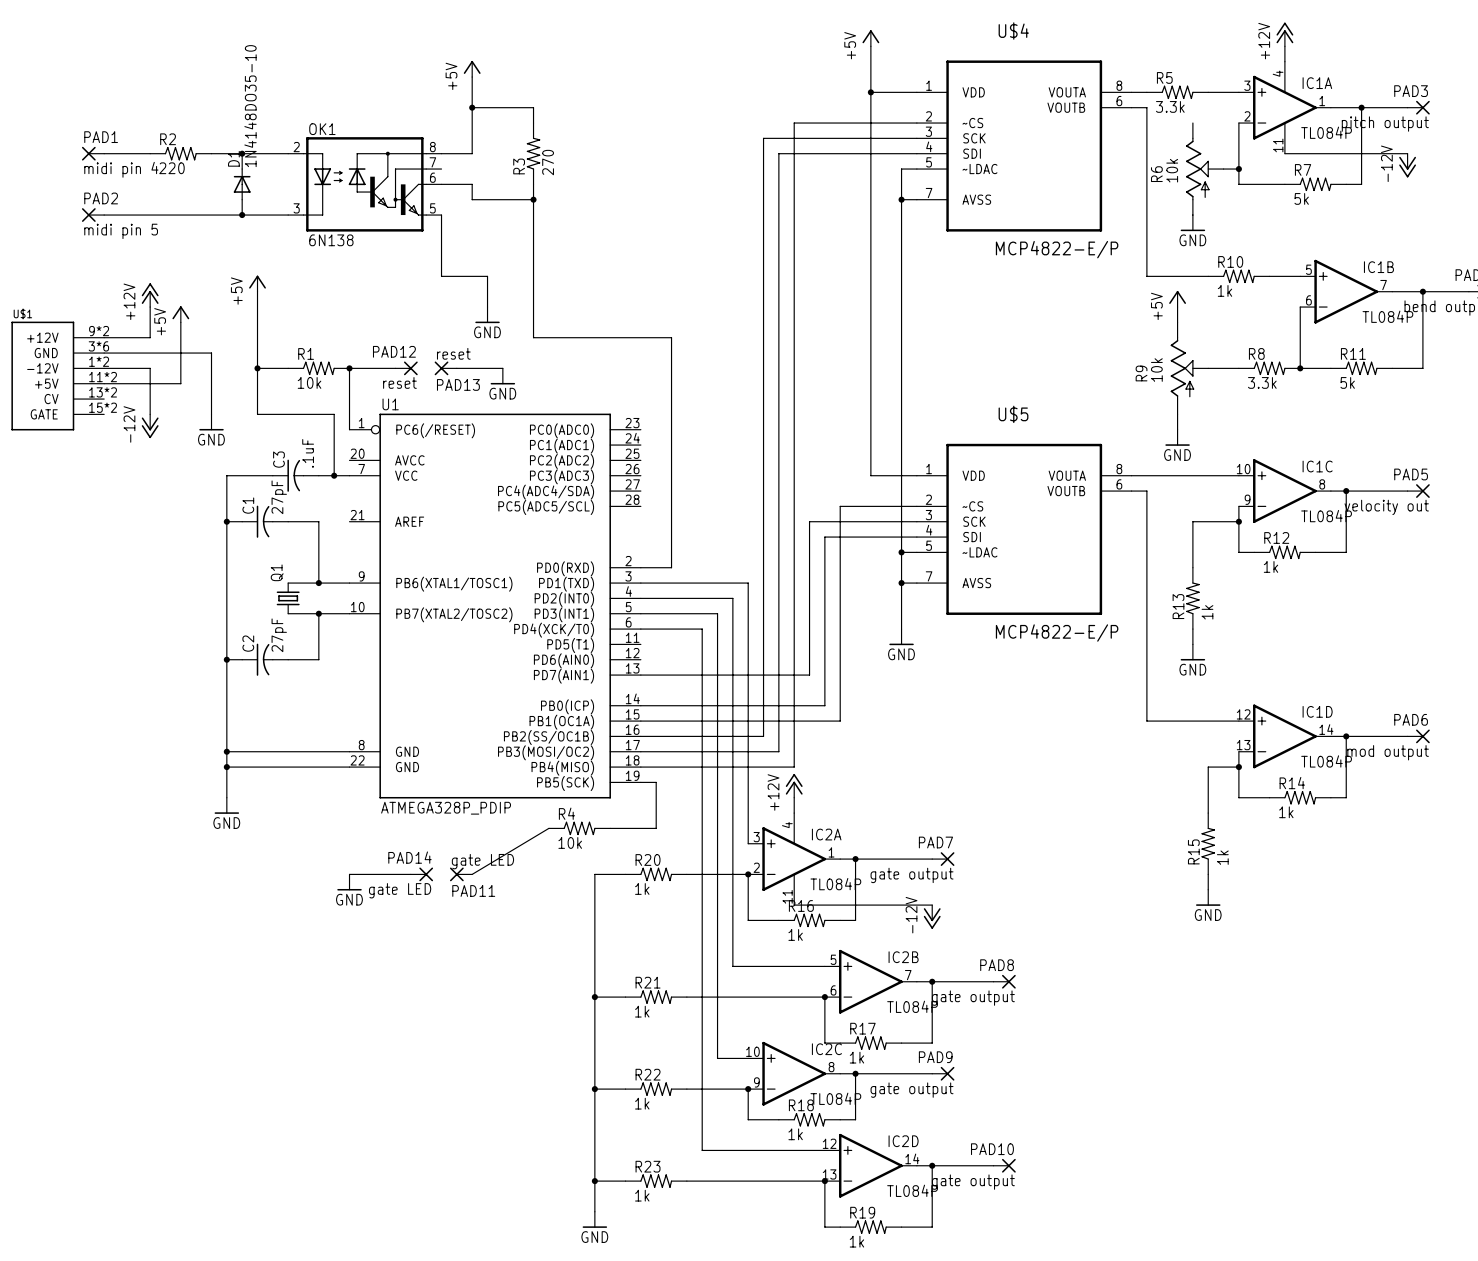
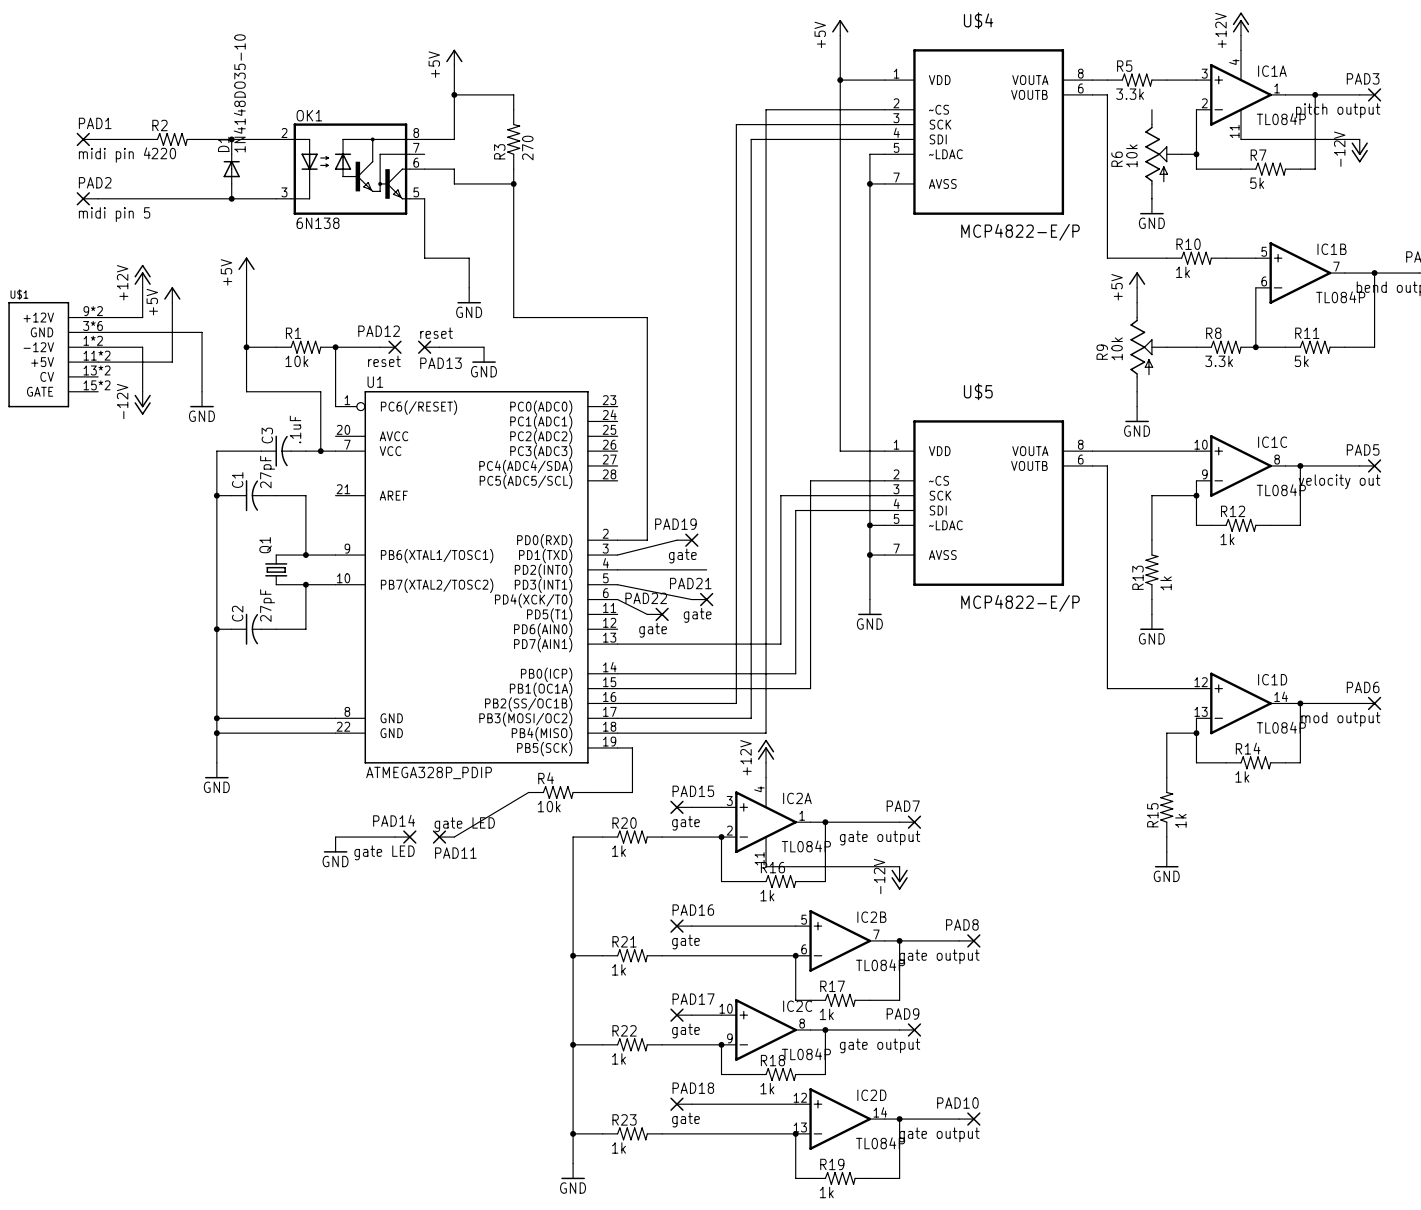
wire: none -> (676, 540) (617, 555)
PAD19: none -> gate (687, 540)
wire: (640, 583) (748, 583) (748, 843) -> (691, 807) (721, 807)
wire: (732, 598) (732, 966) -> (691, 926) (706, 926)
wire: (640, 613) (717, 613) (717, 1058) -> (617, 584) (691, 599)
wire: (640, 629) (702, 629) (702, 1150) (717, 1150) -> (617, 599) (647, 614)
PAD21: none -> gate (702, 599)
PAD22: none -> gate (658, 614)
PAD15: none -> gate (681, 807)
PAD16: none -> gate (681, 926)
PAD17: none -> gate (681, 1015)
PAD18: none -> gate (681, 1104)

